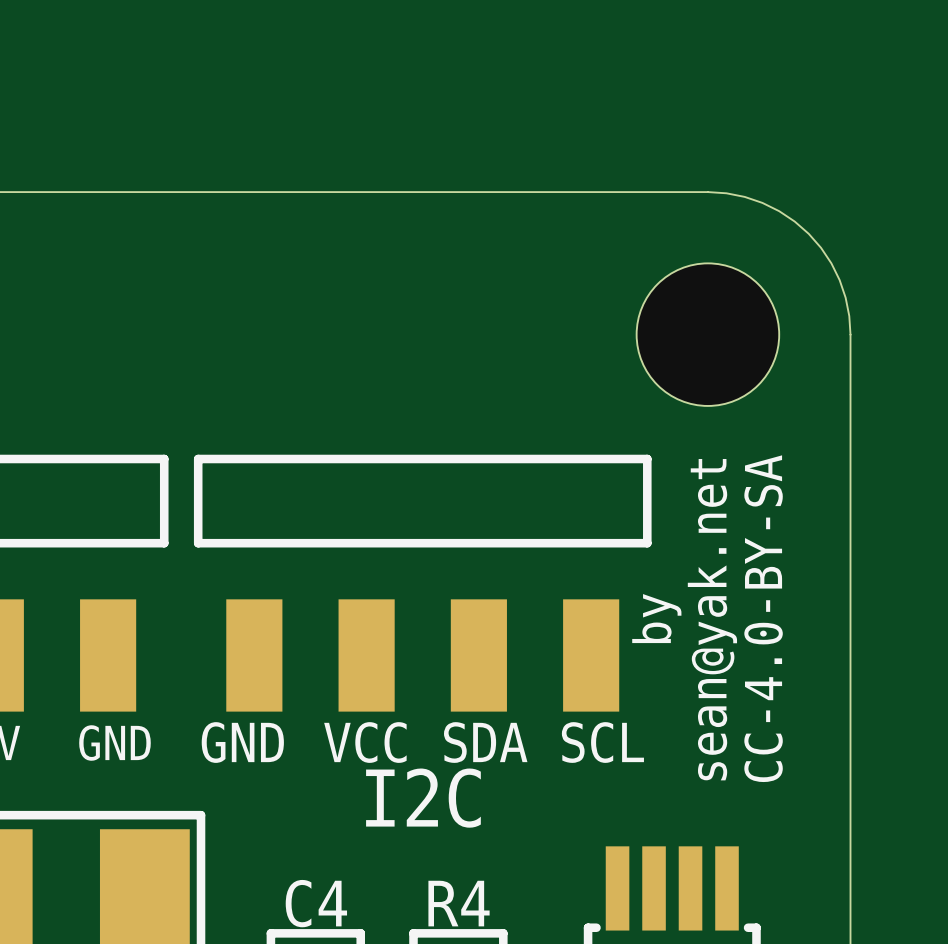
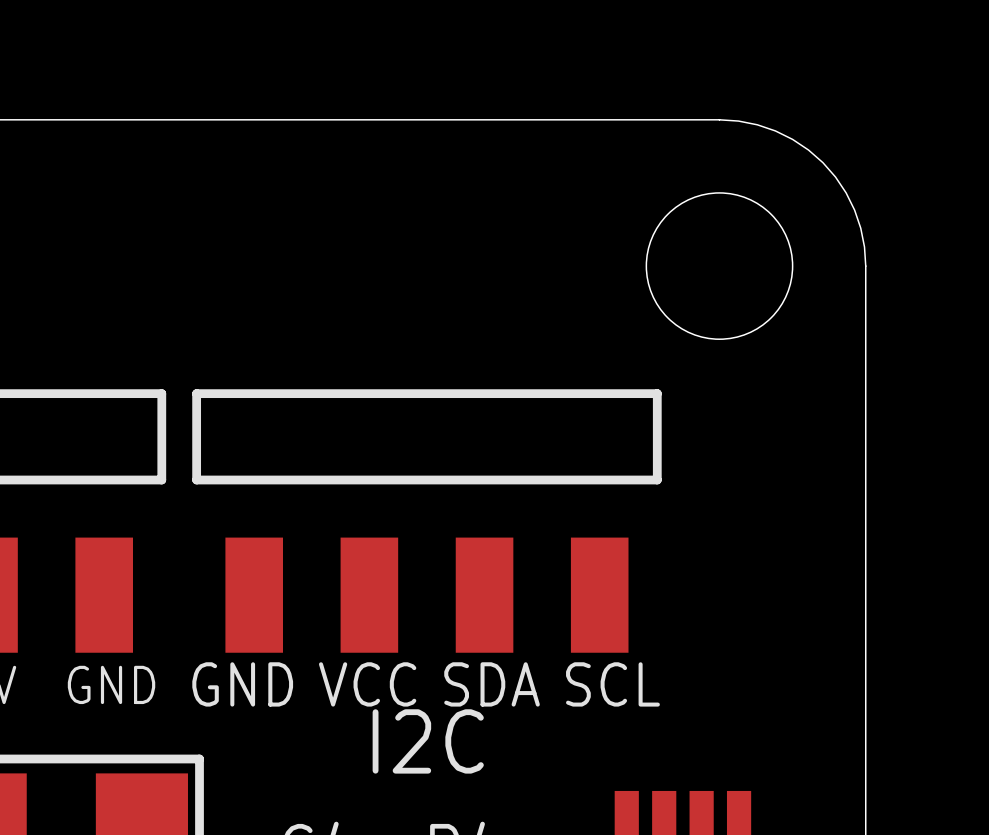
text: by (656, 618) -> none
text: CC-4.0-BY-SA (763, 618) -> none
text: sean@yak.net (712, 619) -> none

